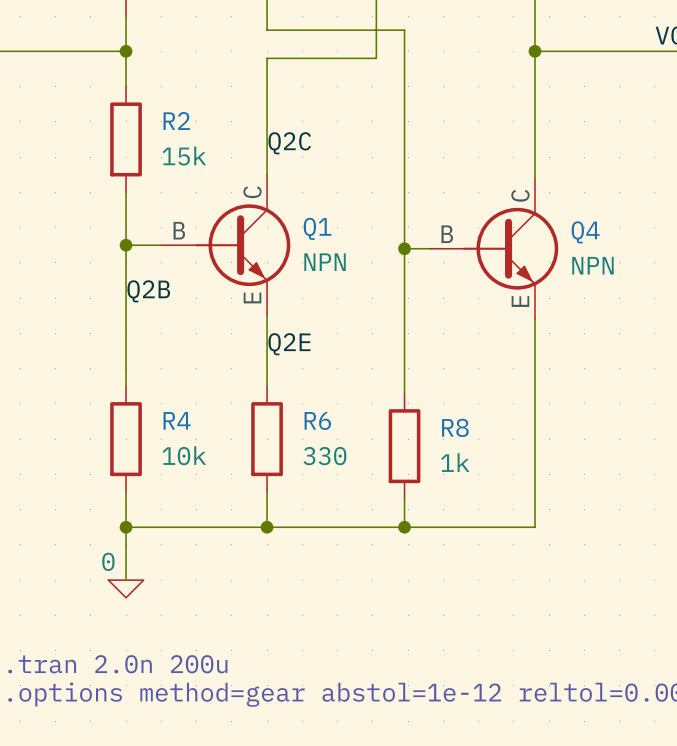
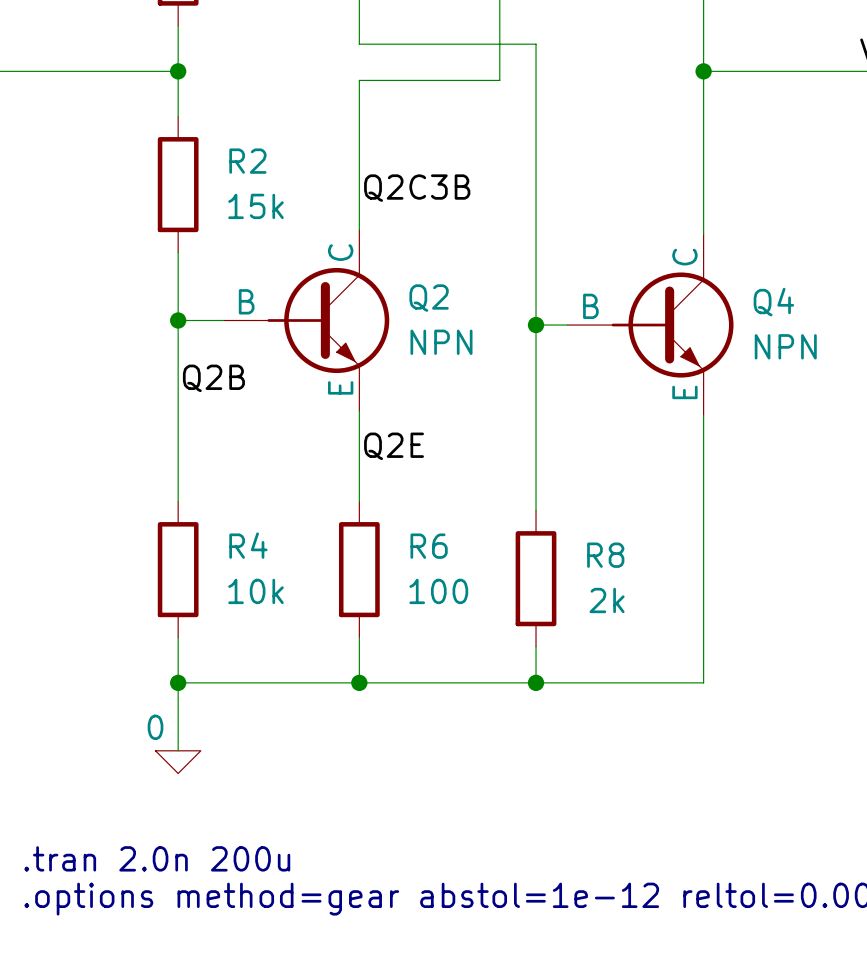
label: Q2C (289, 143) -> Q2C3B (417, 188)
Q1 name: Q1 (317, 228) -> Q2 (429, 298)
R6 value: 330 (324, 456) -> 100 (438, 591)
R8 value: 1k (455, 462) -> 2k (607, 600)

